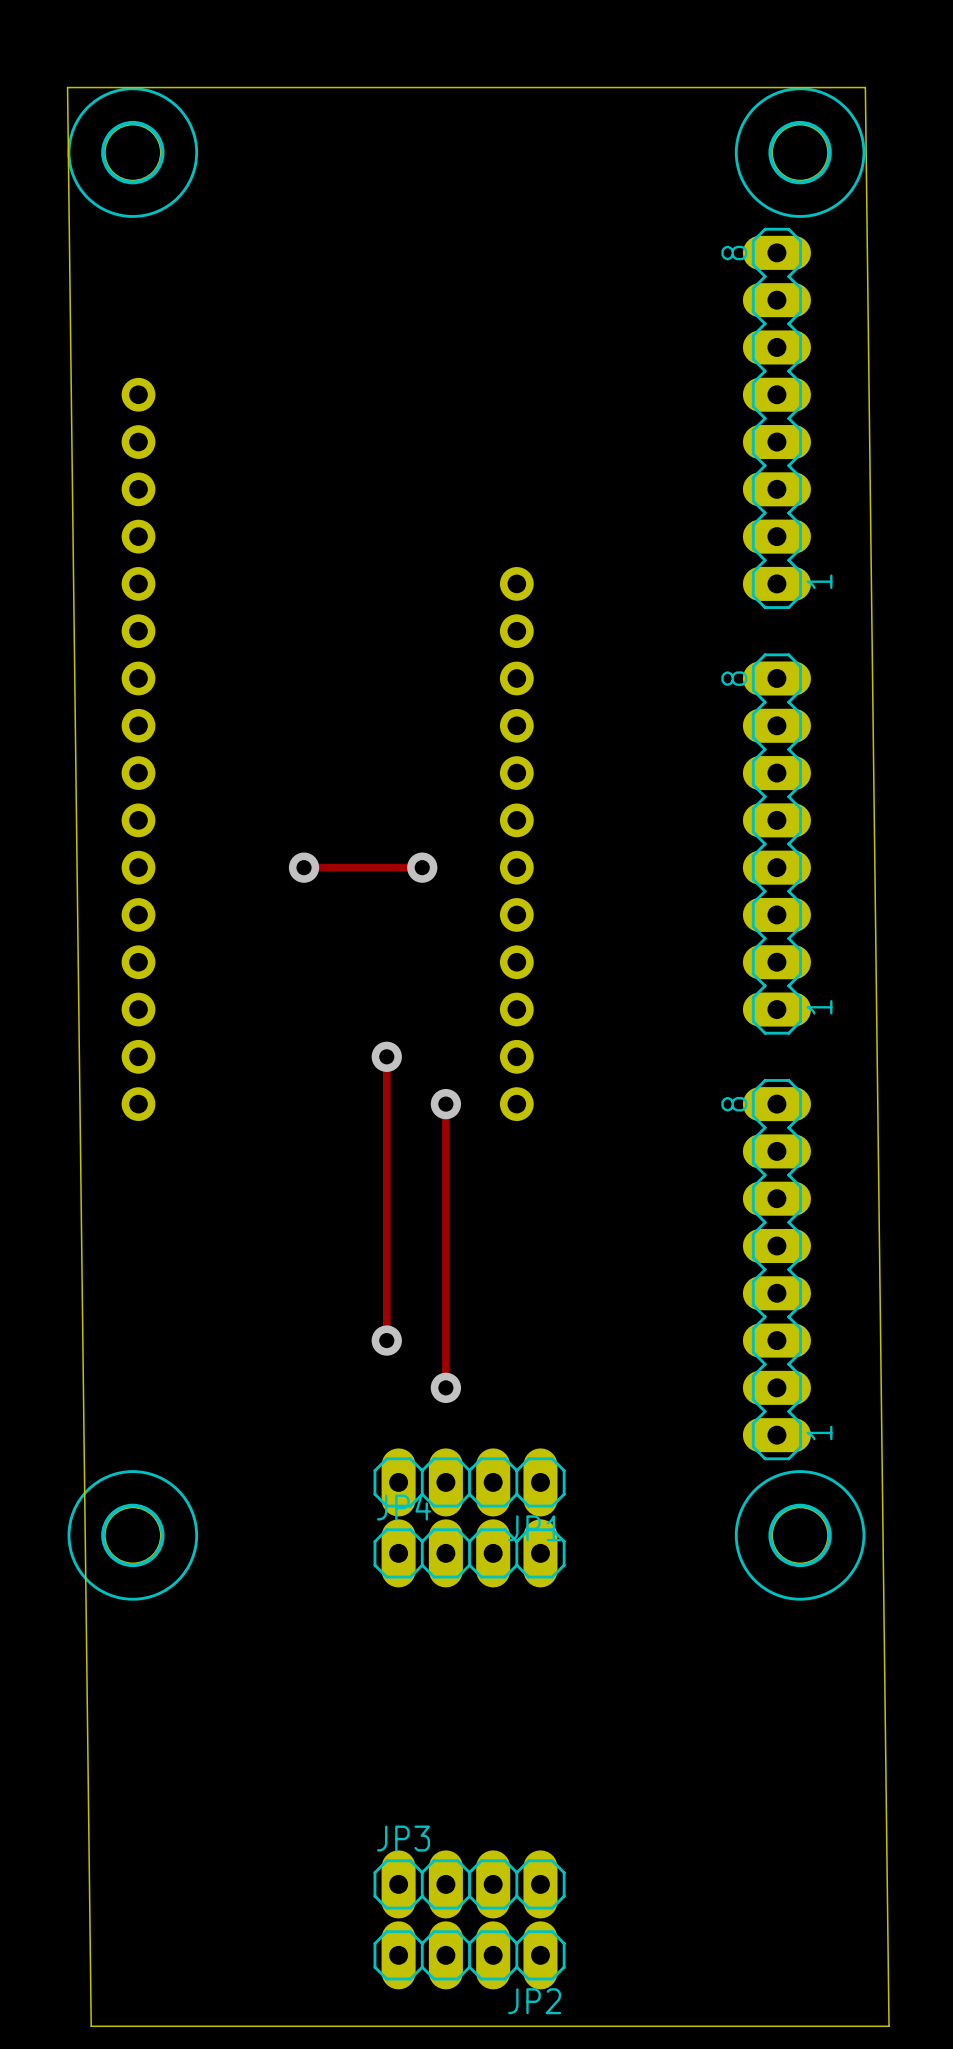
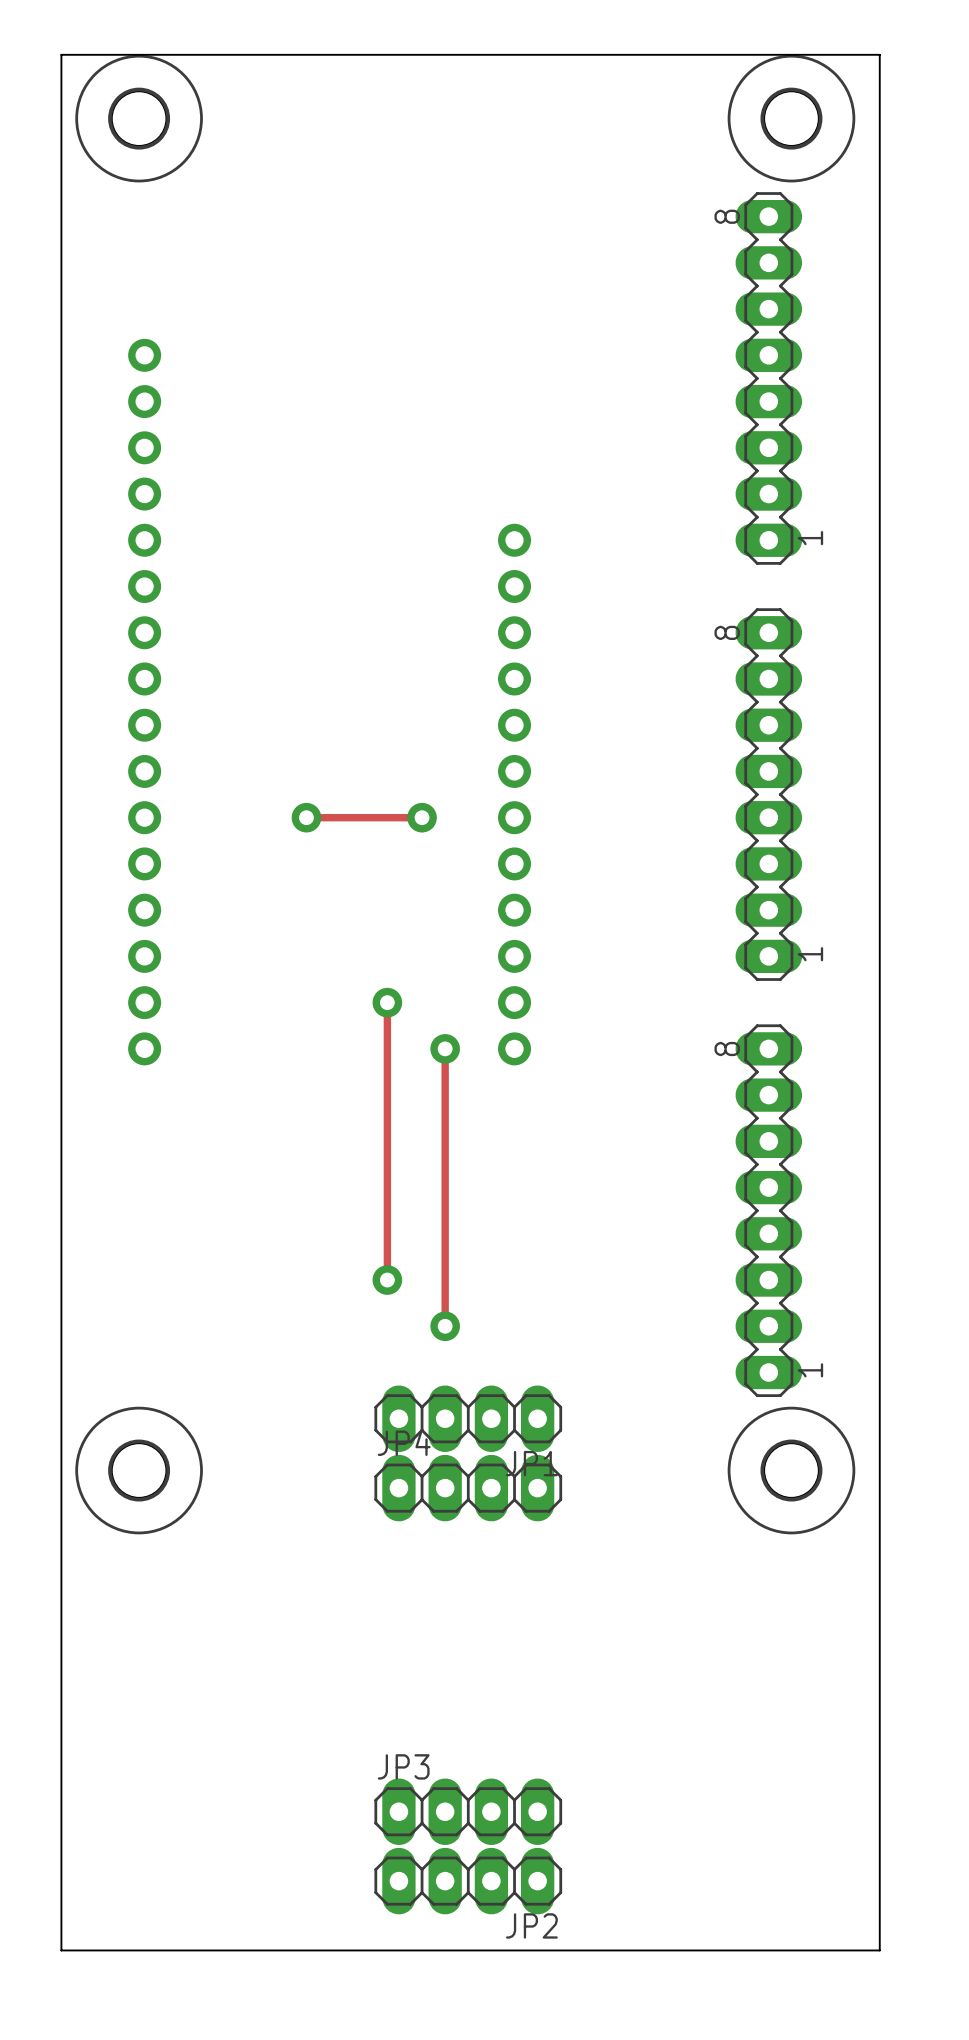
board edge: (91, 2026) (67, 87) (865, 87) (889, 2026) -> (98, 1950) (61, 1950) (61, 54) (879, 54) (878, 1950)

